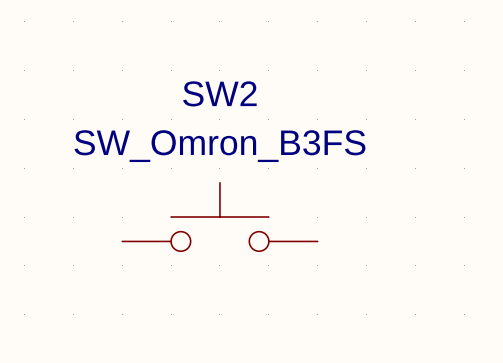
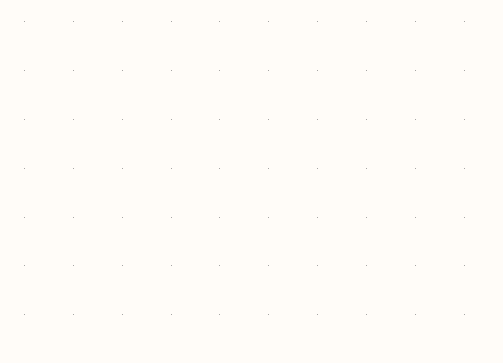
SW2: SW_Omron_B3FS (219, 217) -> none

